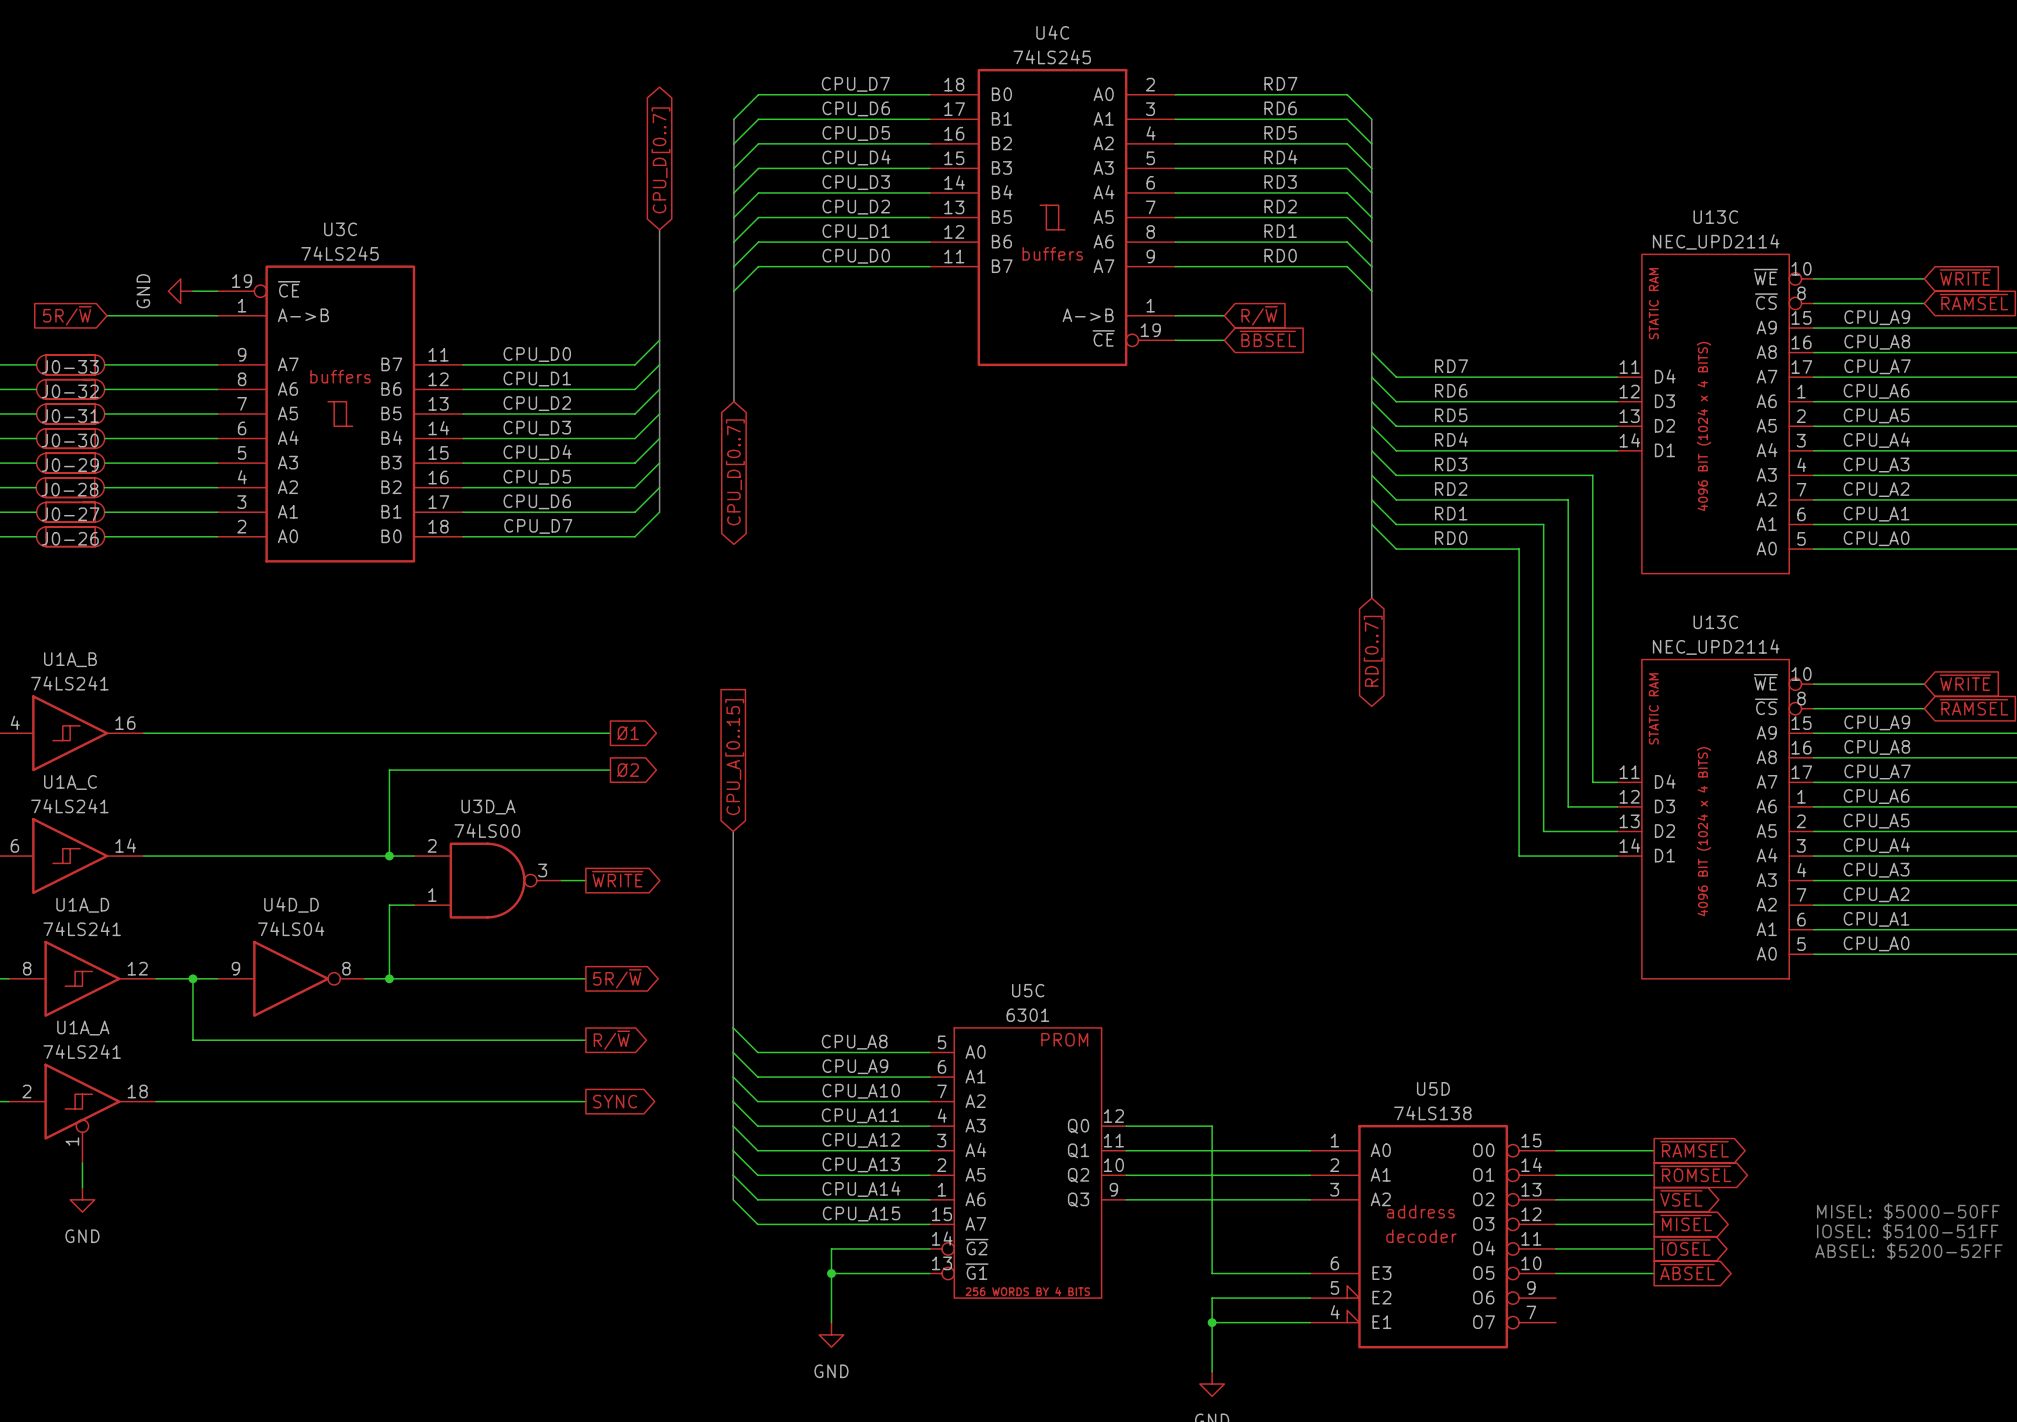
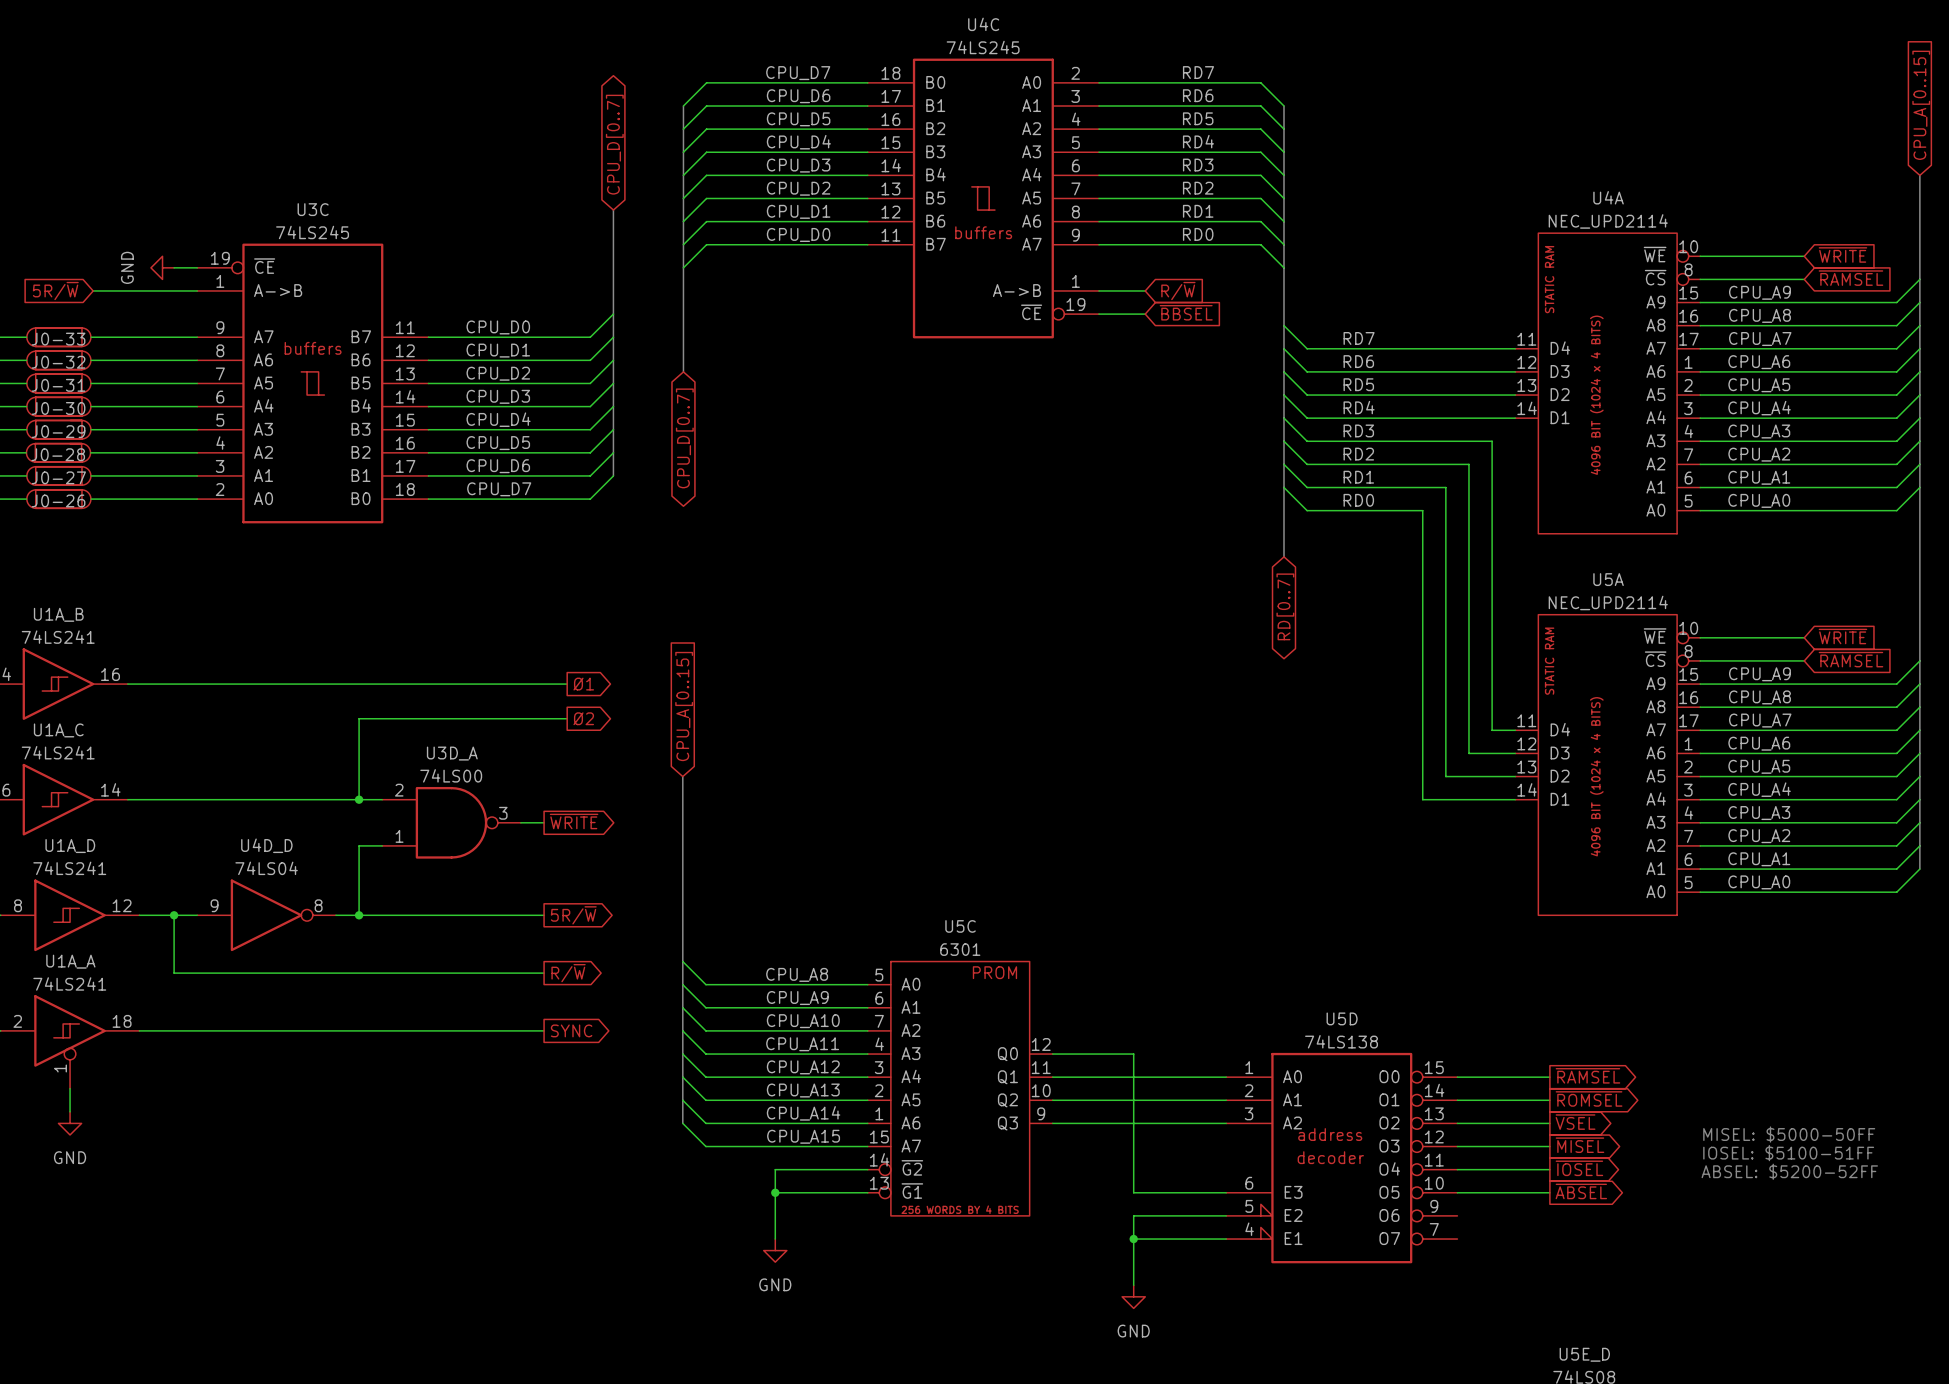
U13C name: U13C (1715, 217) -> U4A (1608, 197)
U13C name: U13C (1715, 622) -> U5A (1608, 579)

